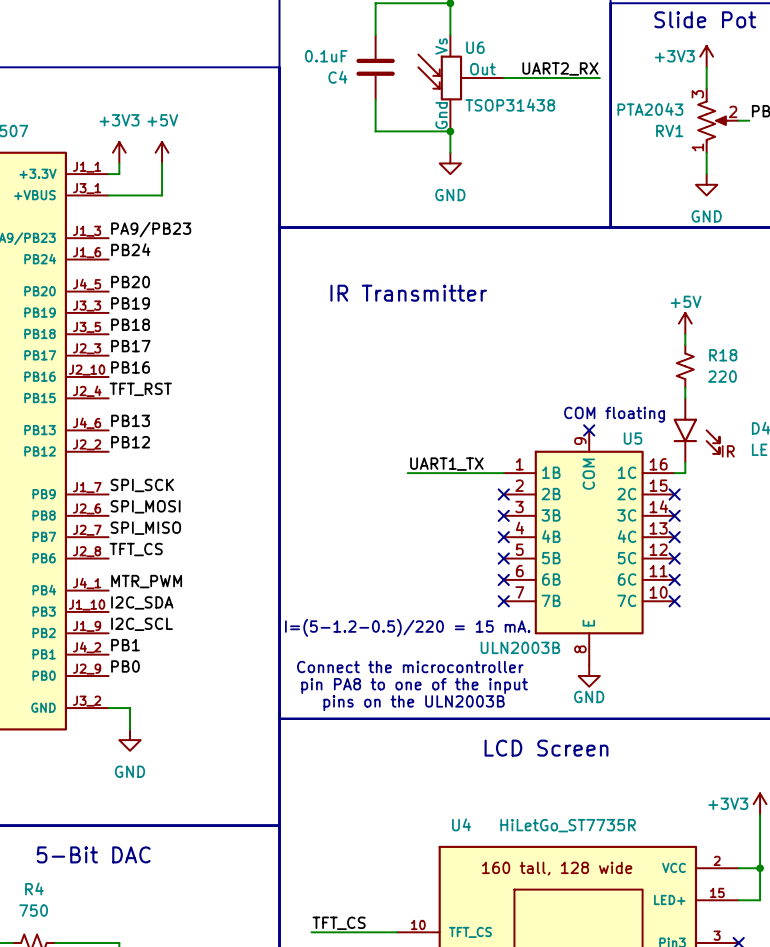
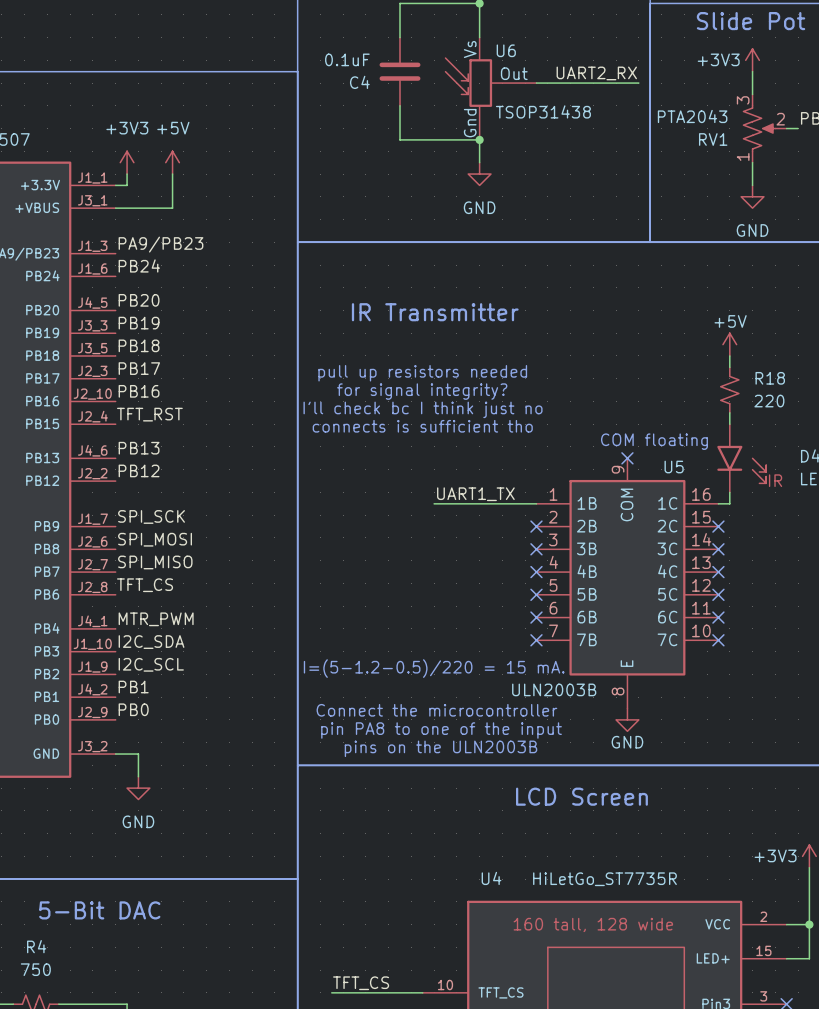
text: none -> pull up resistors needed (422, 373)
text: none -> for signal integrity? (422, 391)
text: none -> I'll check bc I think just no (423, 409)
text: none -> connects is sufficient tho (422, 426)

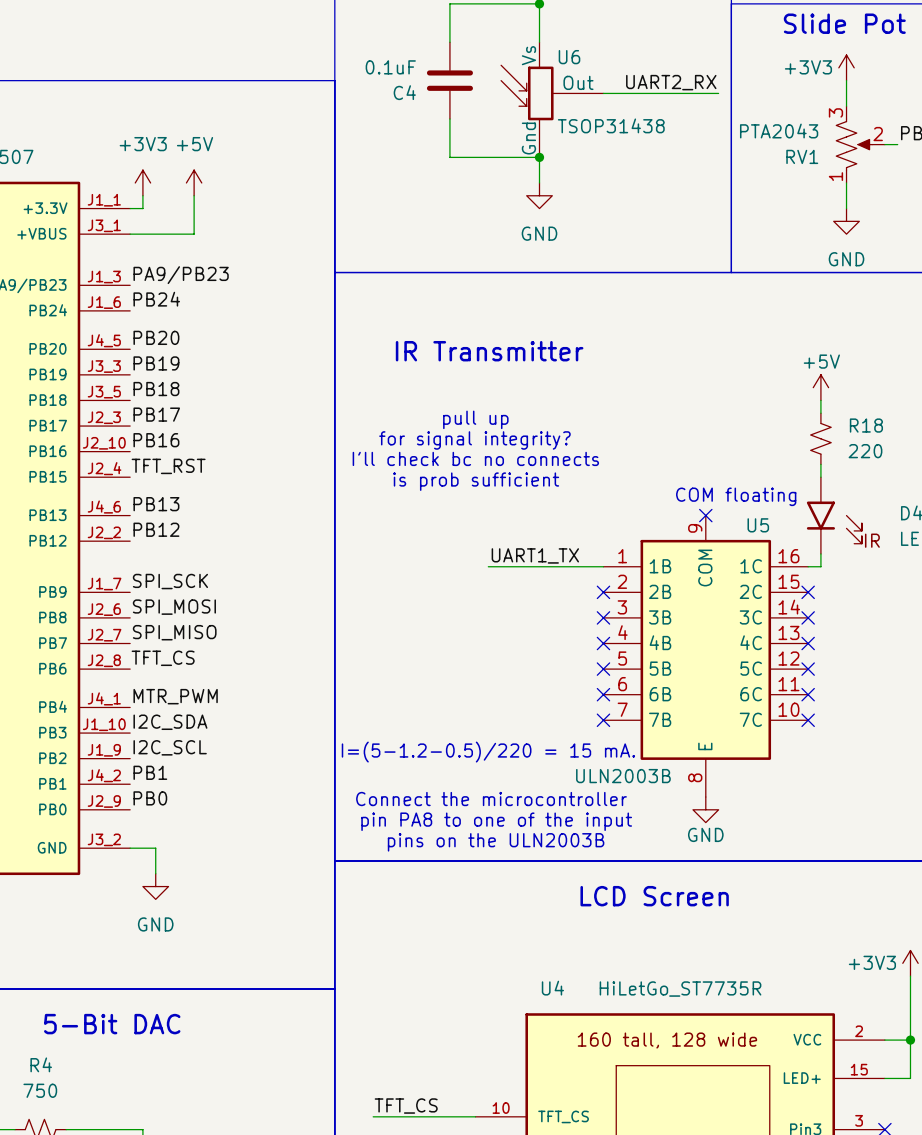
text: pull up resistors needed (422, 373) -> pull up (475, 419)
text: I'll check bc I think just no (423, 409) -> I'll check bc no connects (475, 458)
text: connects is sufficient tho (422, 426) -> is prob sufficient (476, 481)

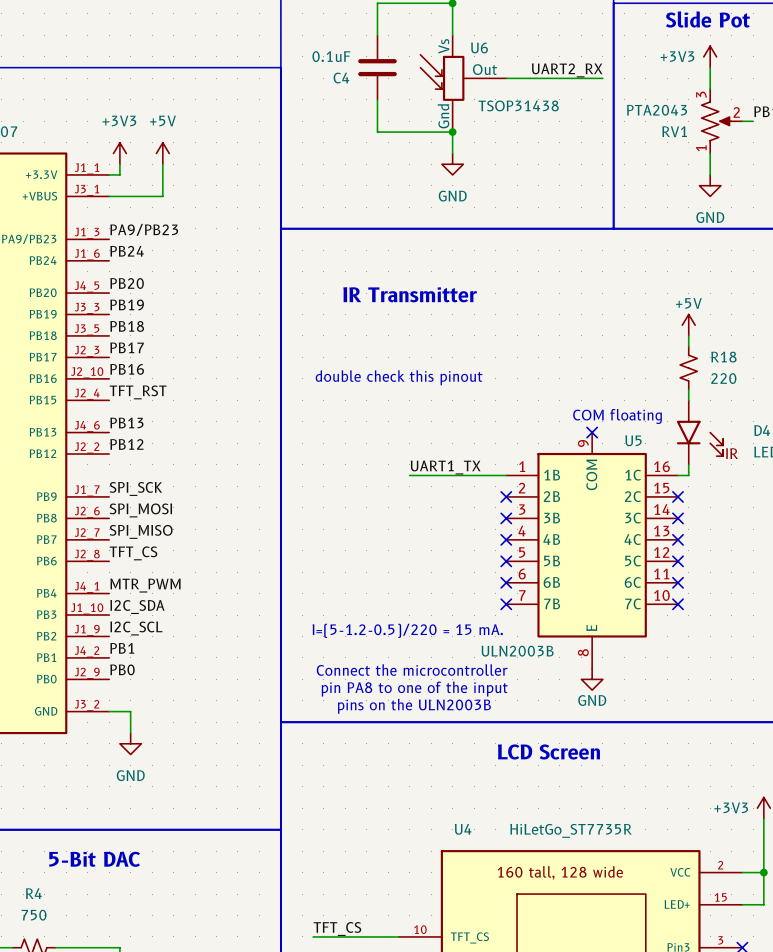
text: pull up (475, 419) -> none
text: for signal integrity? (474, 440) -> none
text: none -> double check this pinout (399, 377)
text: I'll check bc no connects (475, 458) -> none
text: is prob sufficient (476, 481) -> none

